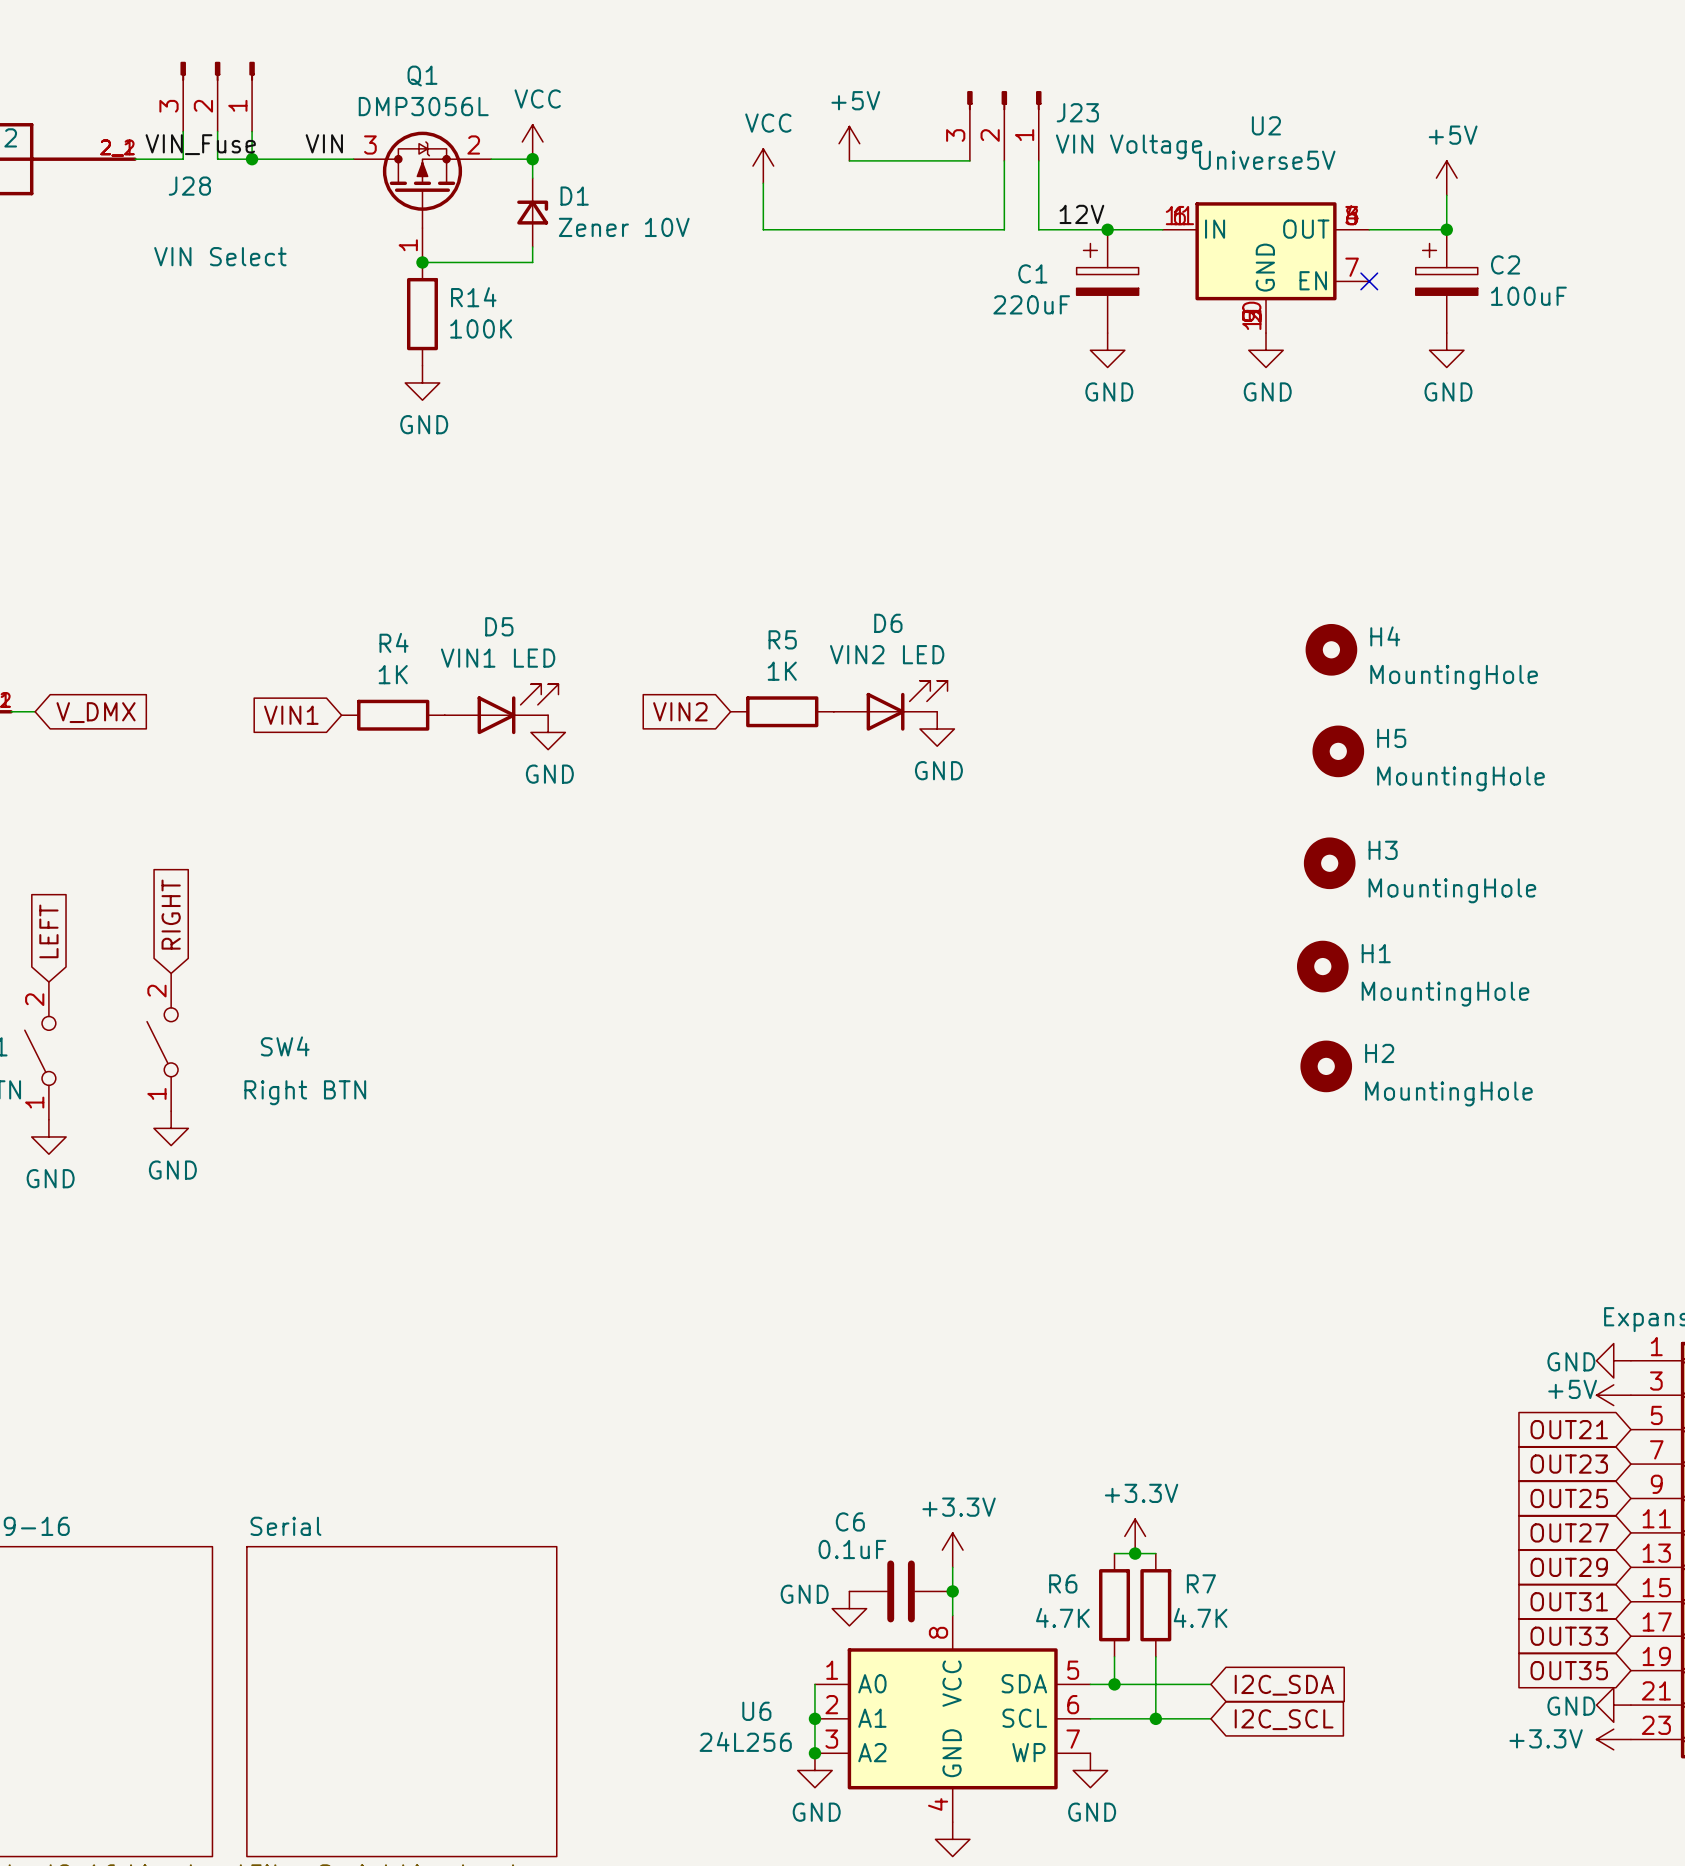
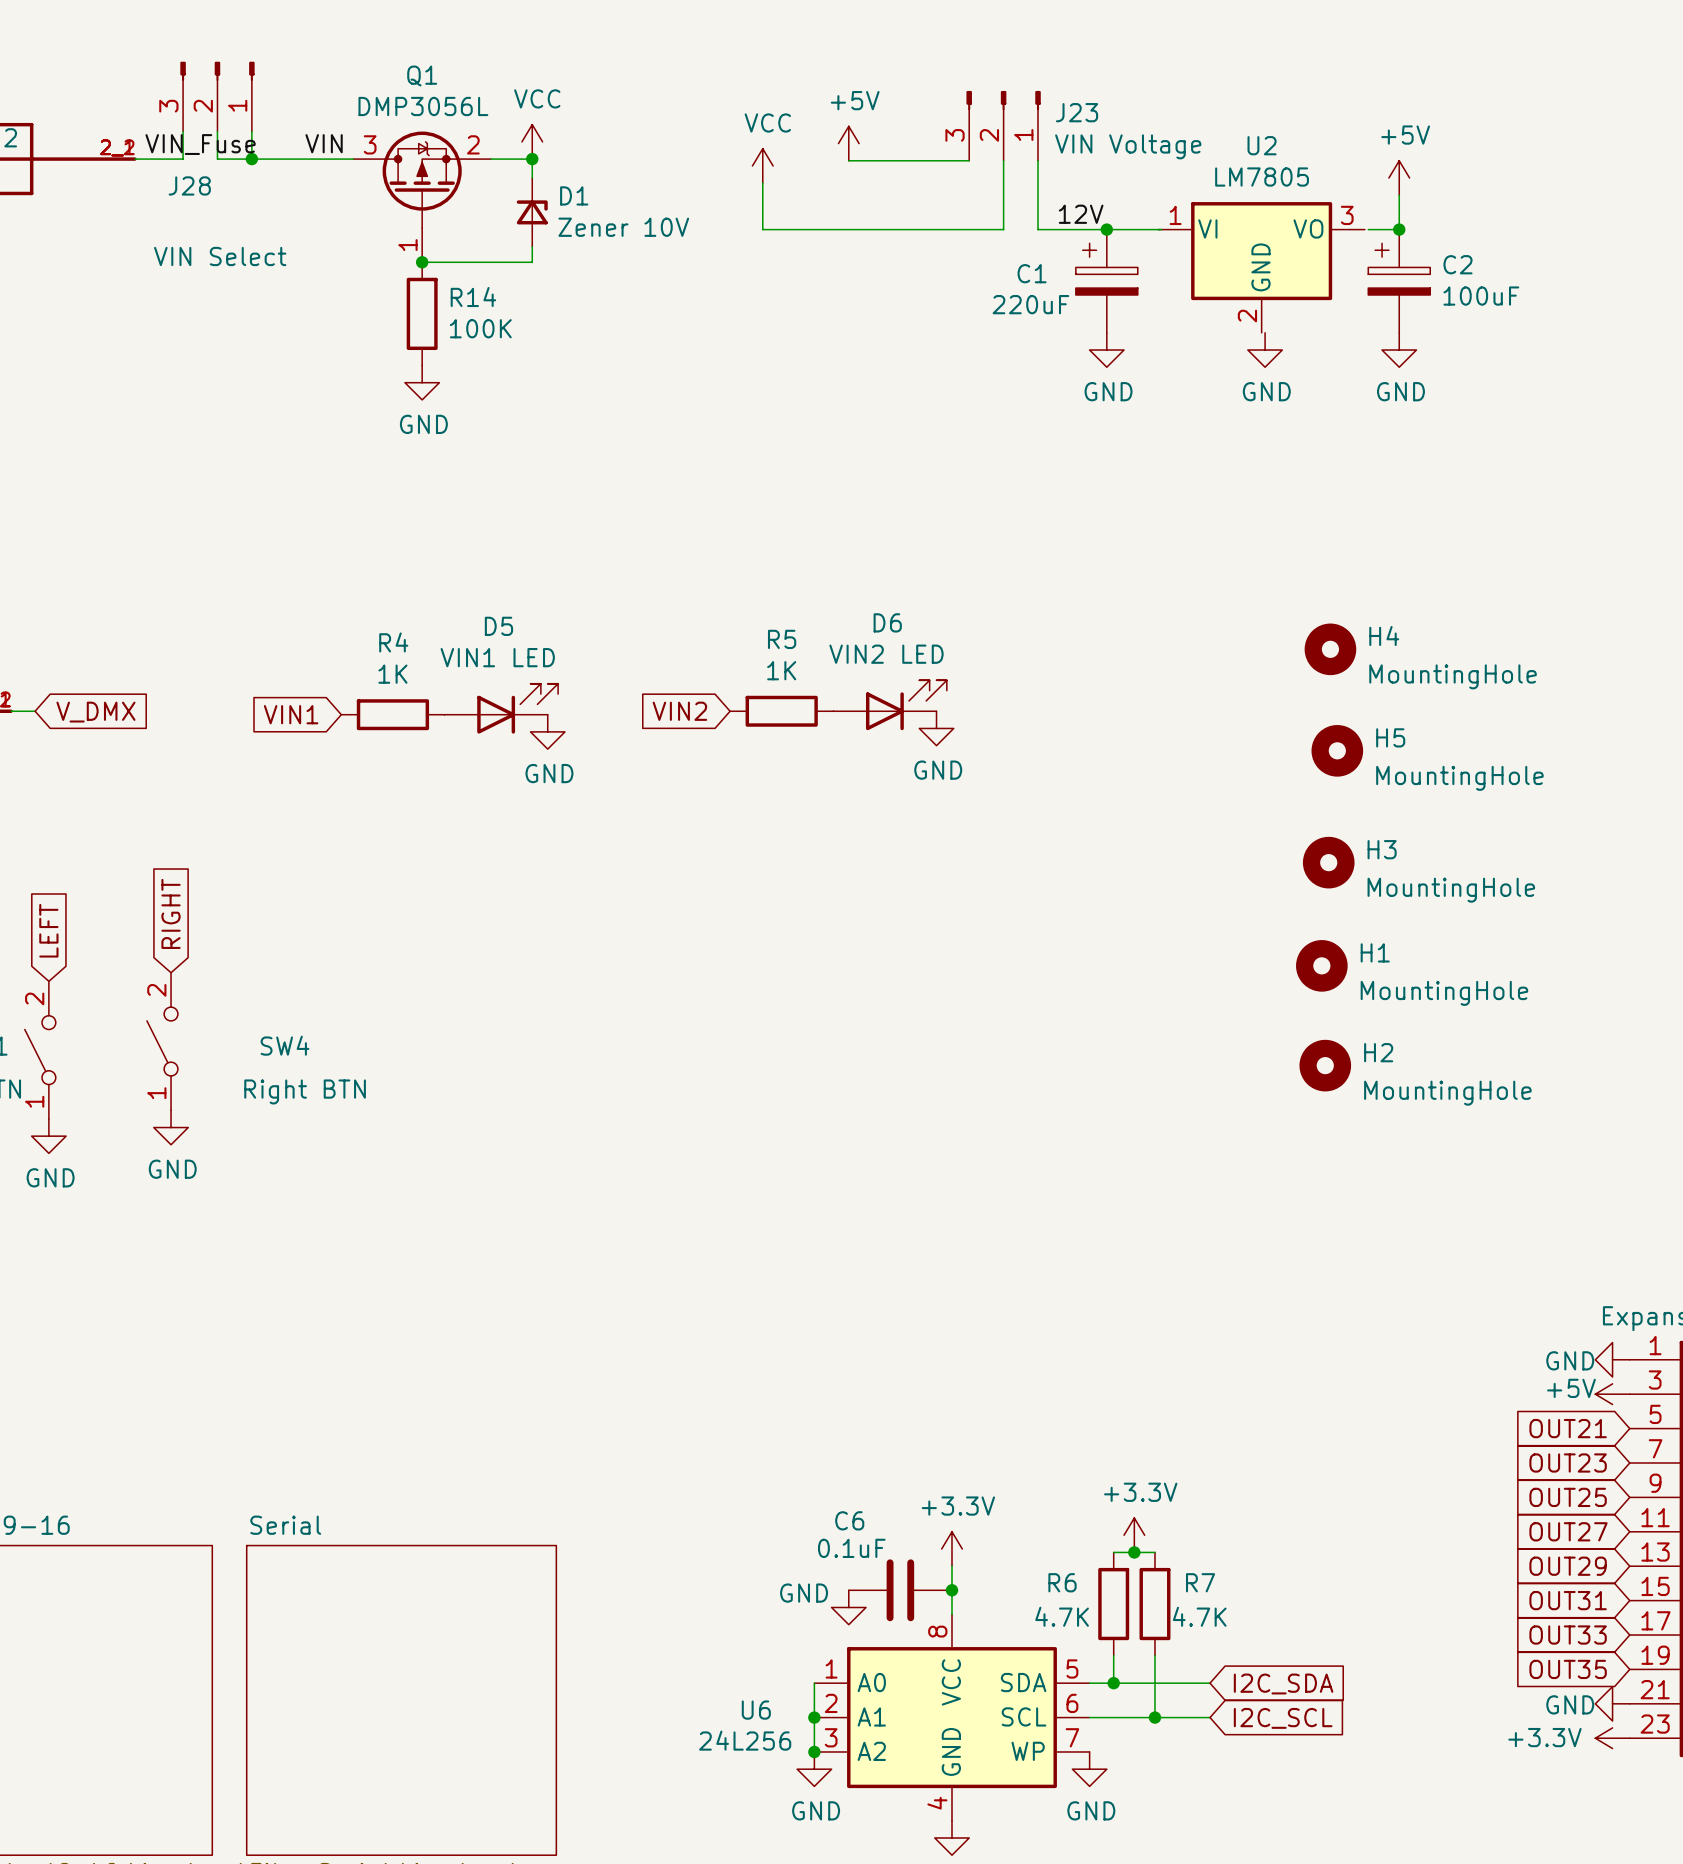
U2 value: Universe5V (1267, 160) -> LM7805 (1262, 177)
power symbol position: +5V (1446, 178) -> +5V (1399, 177)
wire: (1446, 195) (1446, 229) (1400, 229) -> (1399, 195) (1399, 229)
U2 symbol: [1162, 202, 1370, 334] -> [1158, 202, 1365, 333]
junction position: (1446, 229) -> (1399, 229)
no-connect mark: (1369, 281) -> none
C2 position: (1446, 281) -> (1399, 281)
power symbol position: GND (1446, 350) -> GND (1399, 350)

